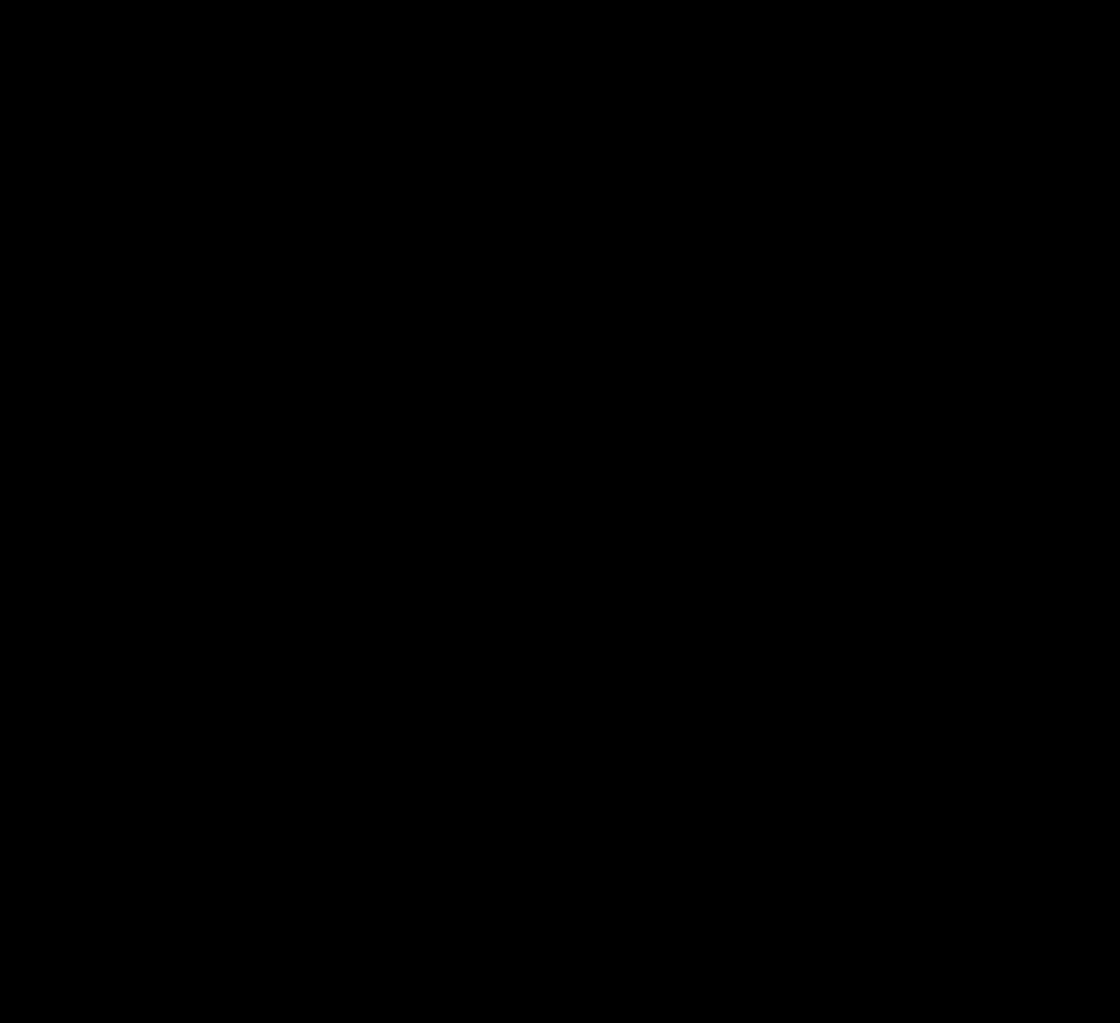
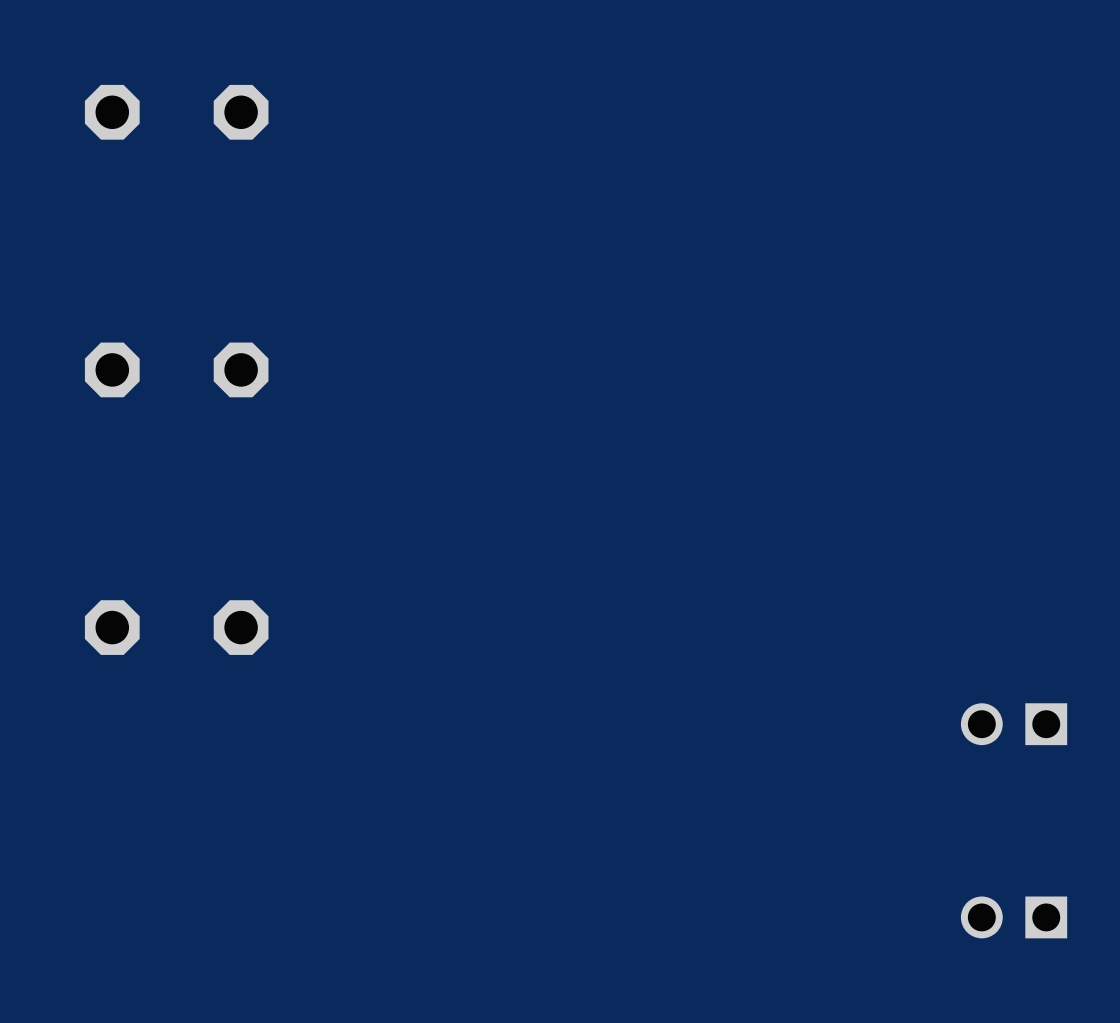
part: none -> (112, 112)
part: none -> (241, 112)
part: none -> (112, 369)
part: none -> (241, 369)
part: none -> (112, 627)
part: none -> (241, 627)
part: none -> (1014, 724)
part: none -> (1014, 917)

